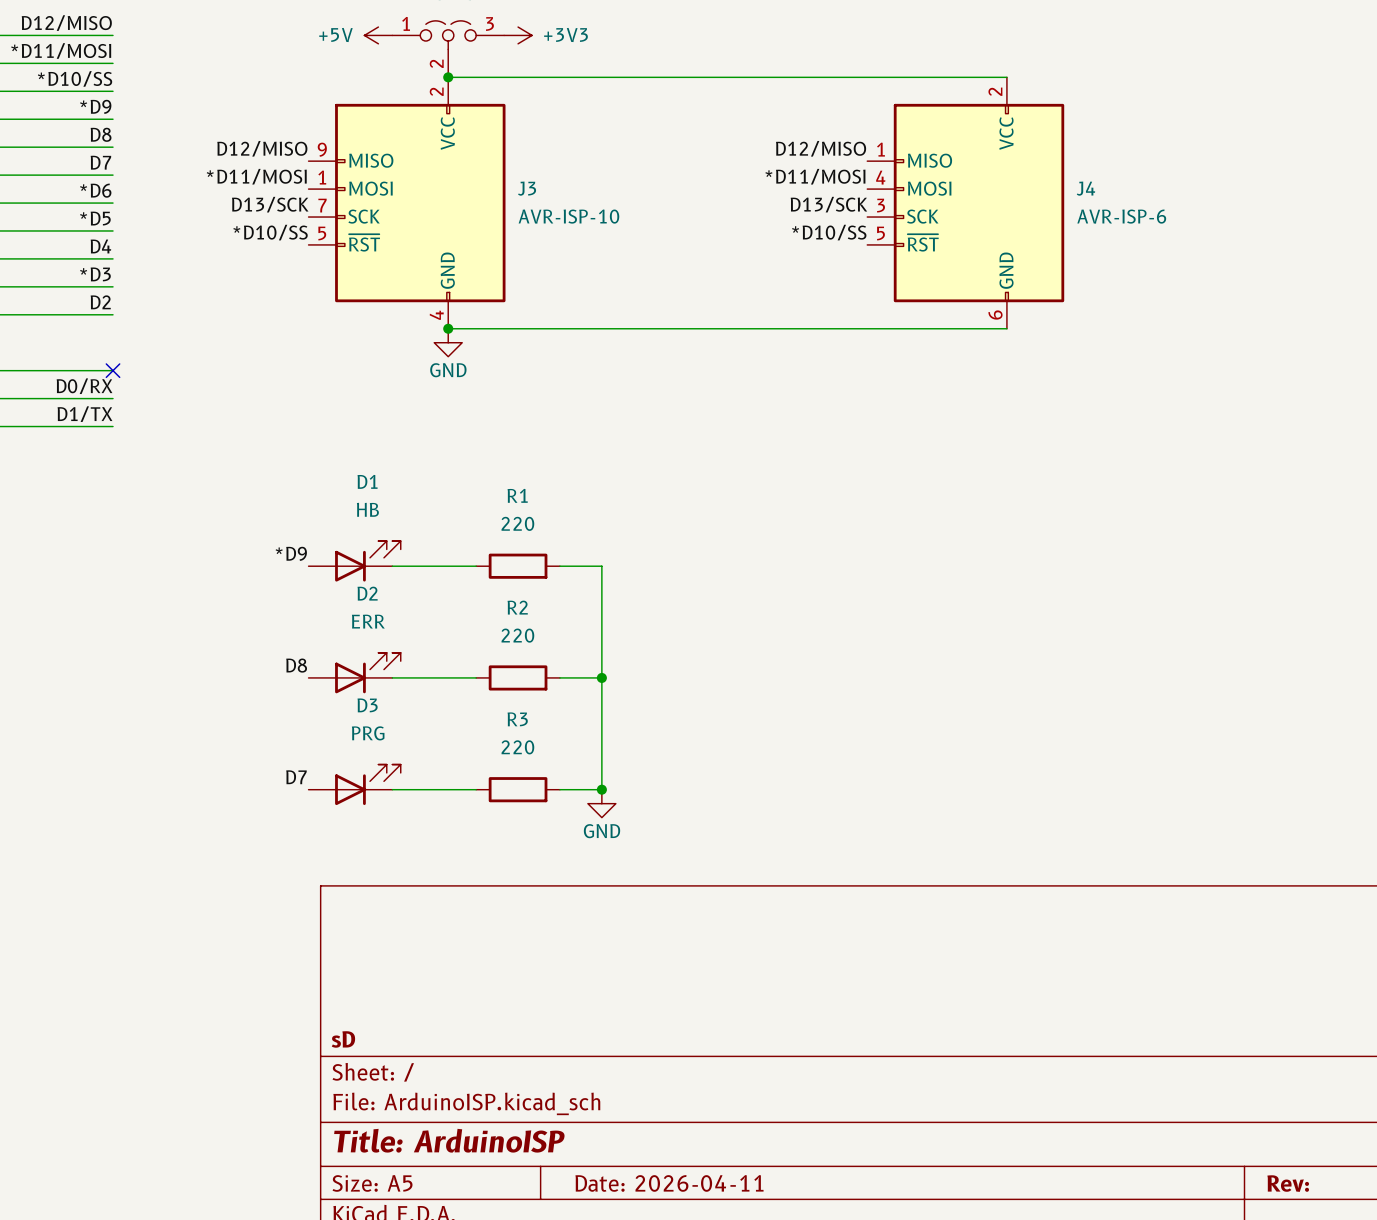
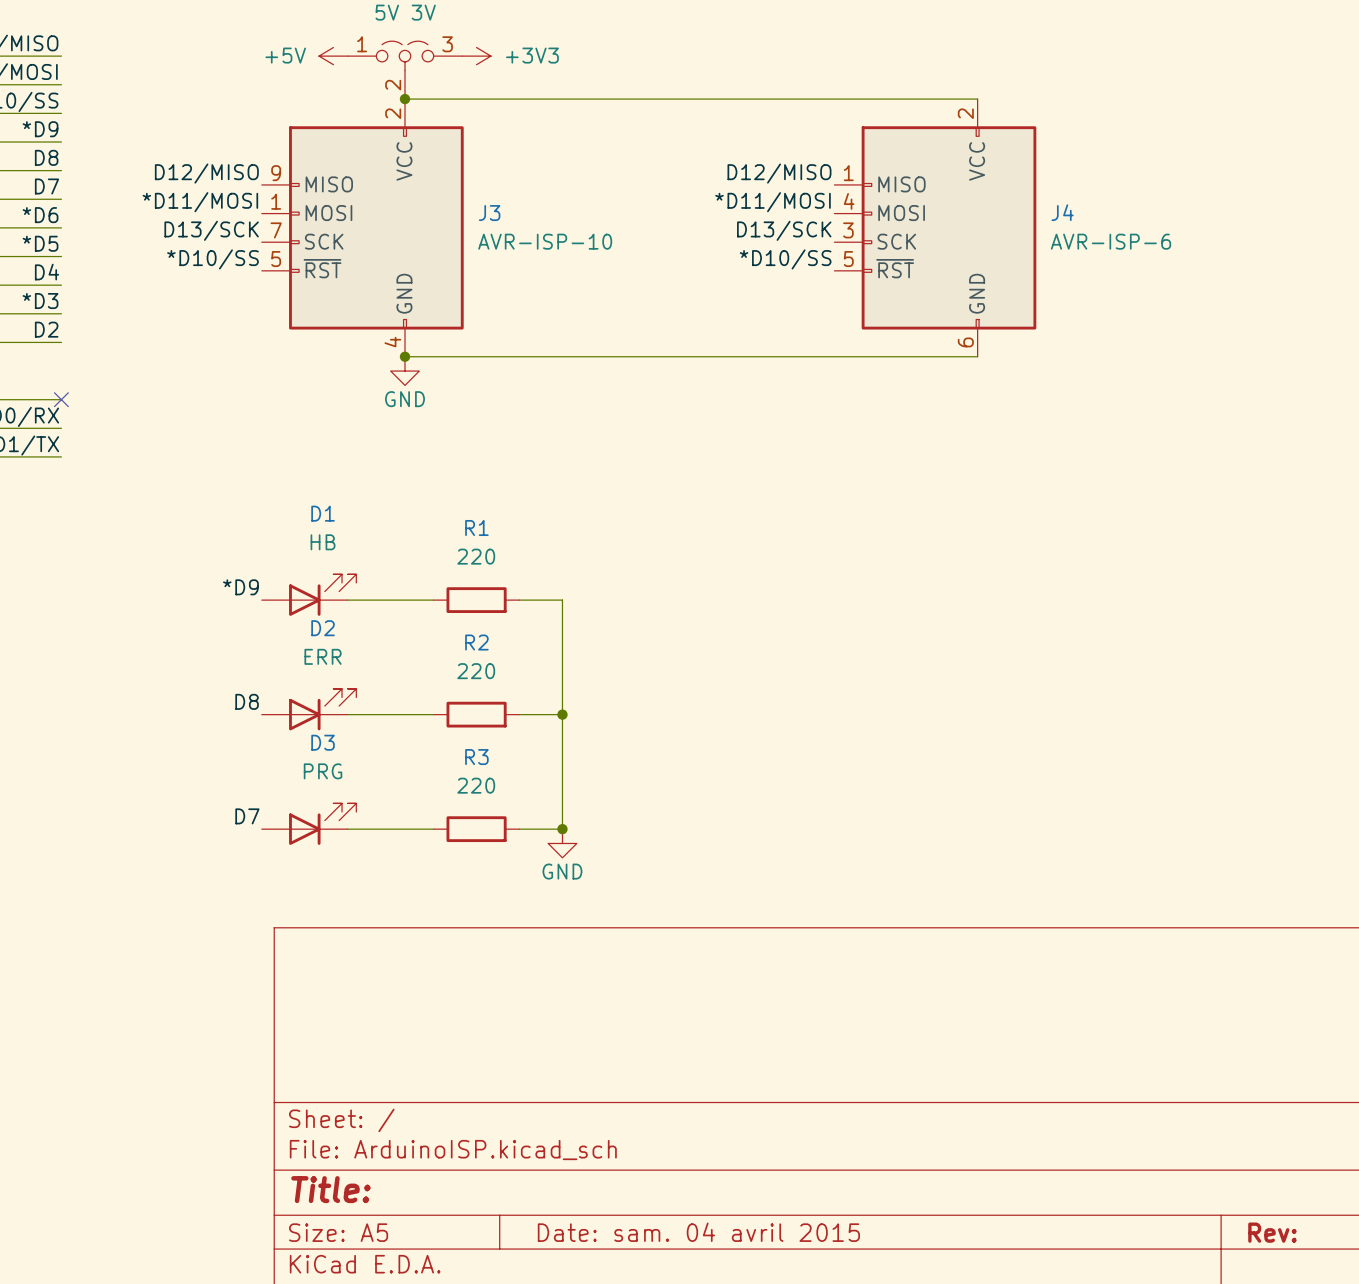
title block: sD (343, 1039) -> none
title block: Title: ArduinoISP (449, 1140) -> Title: (330, 1189)
title block: Date: 2026-04-11 (669, 1183) -> Date: sam. 04 avril 2015 (698, 1232)

